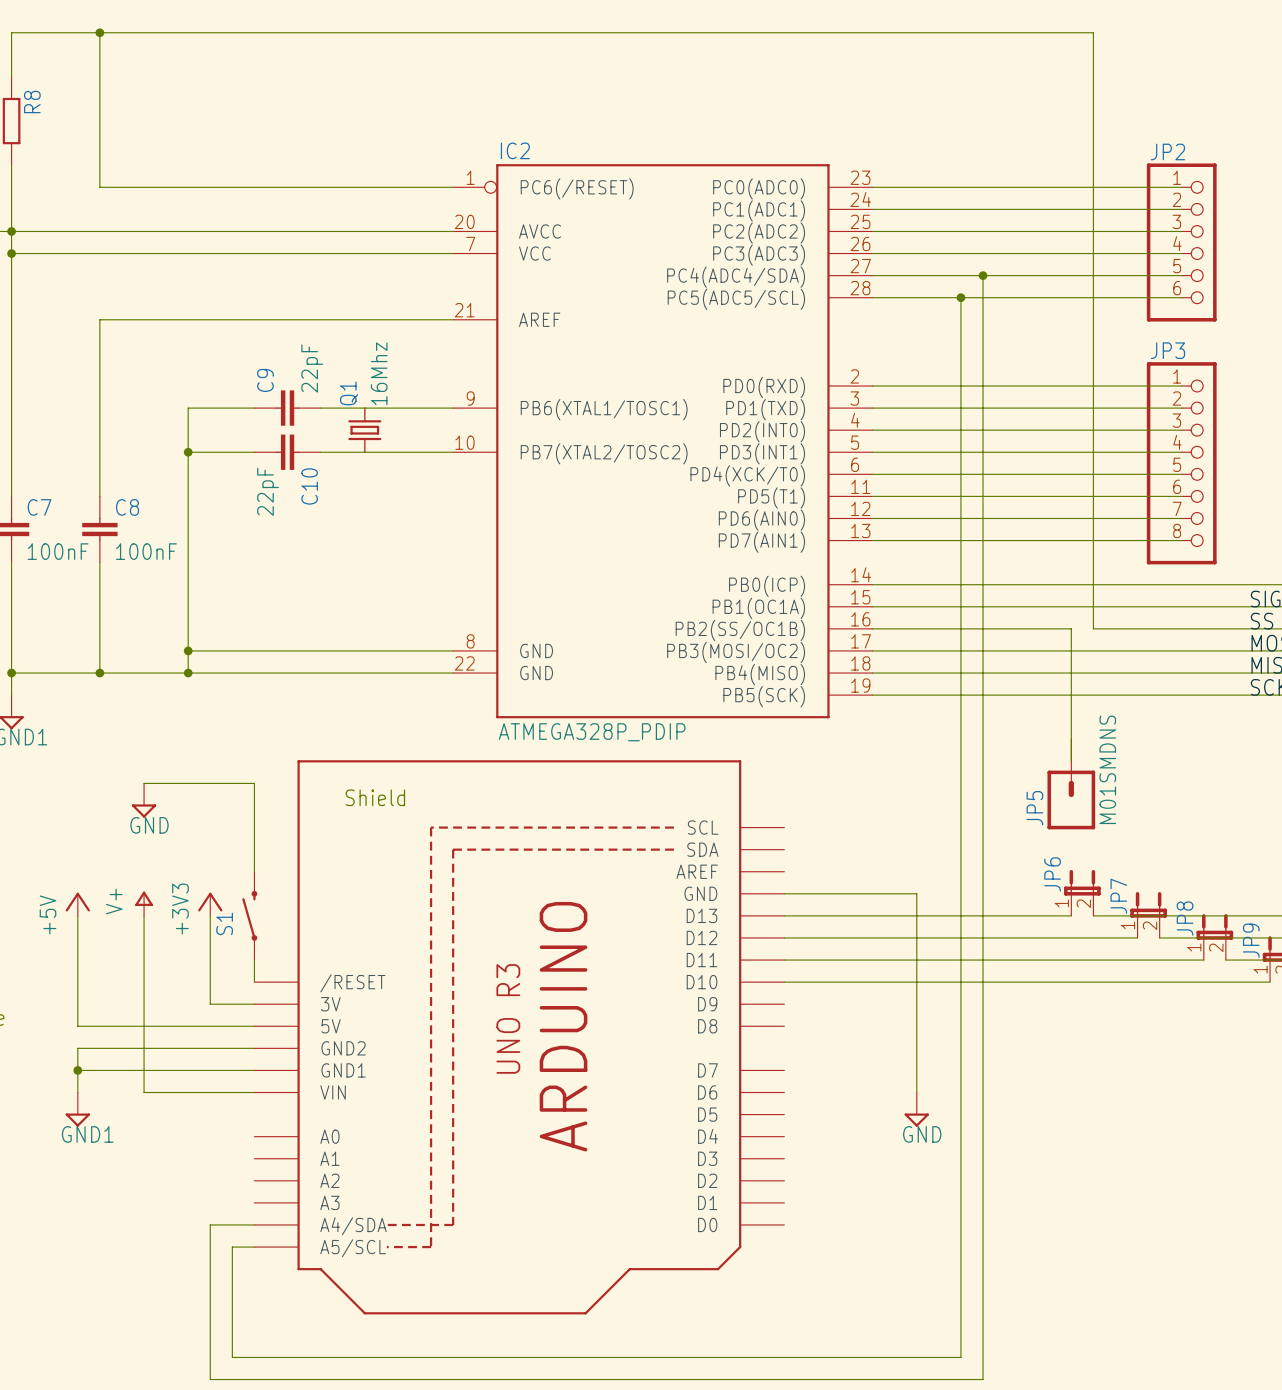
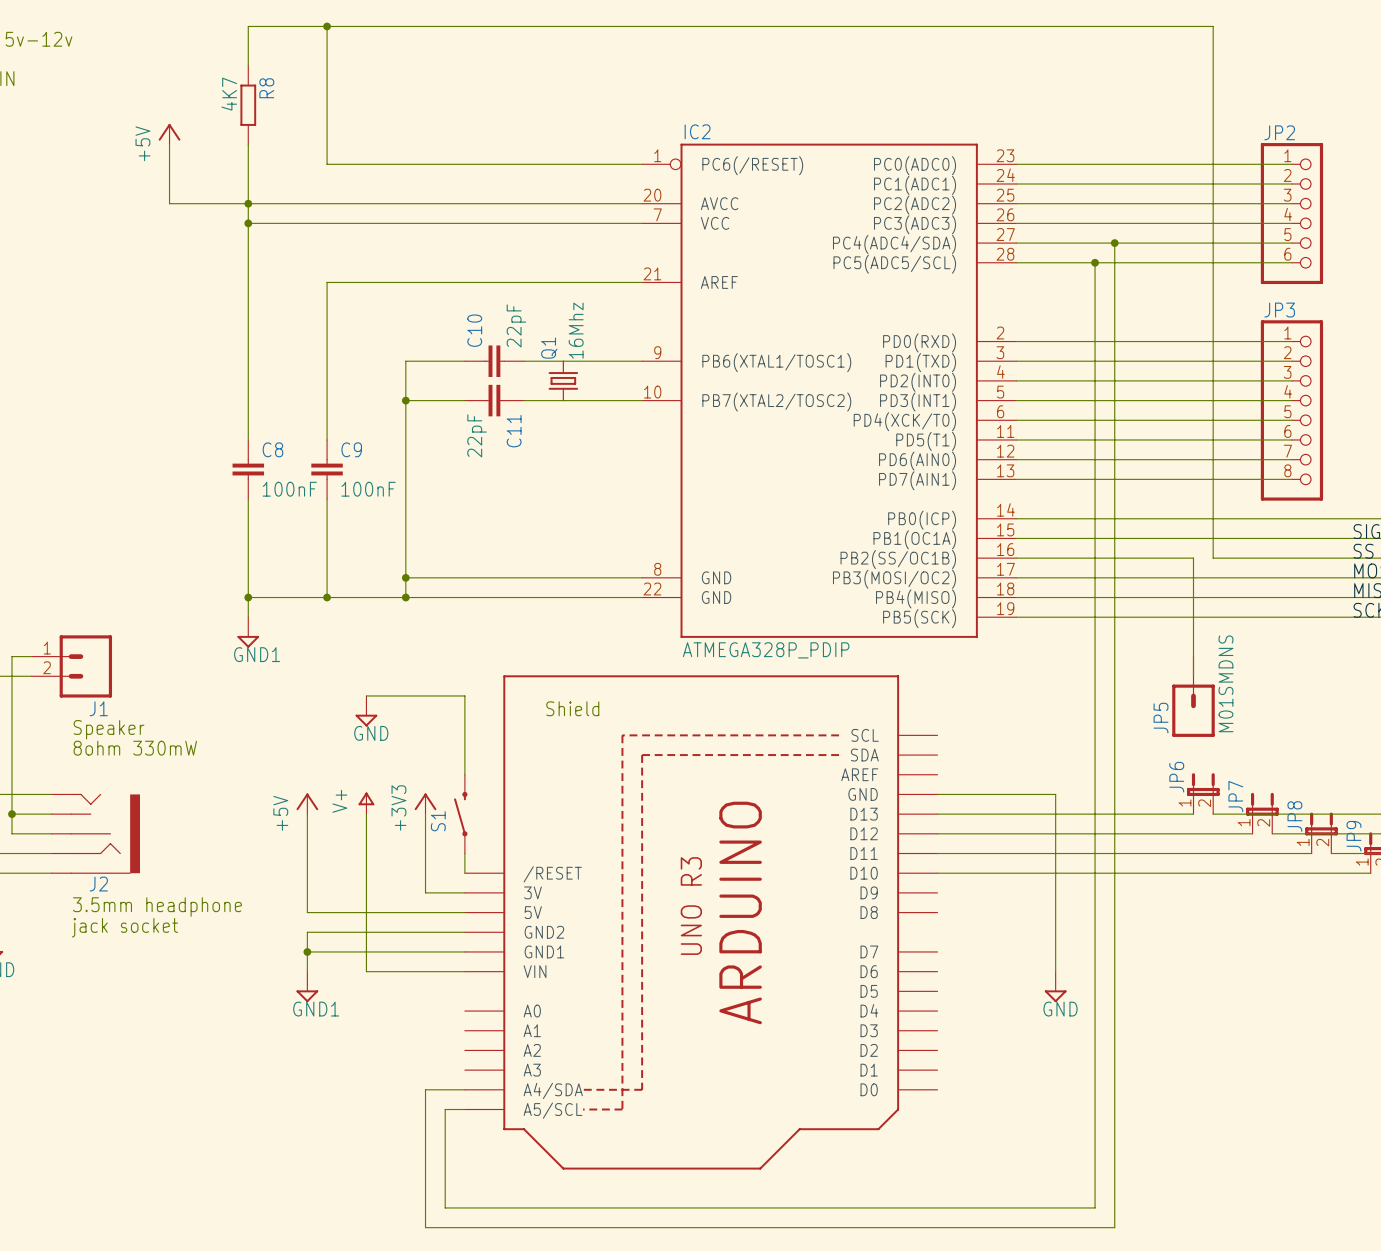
C9 name: C9 (265, 380) -> C10 (474, 330)
C10 name: C10 (309, 486) -> C11 (514, 431)
C7 name: C7 (39, 507) -> C8 (272, 449)
C8 name: C8 (127, 507) -> C9 (351, 449)

